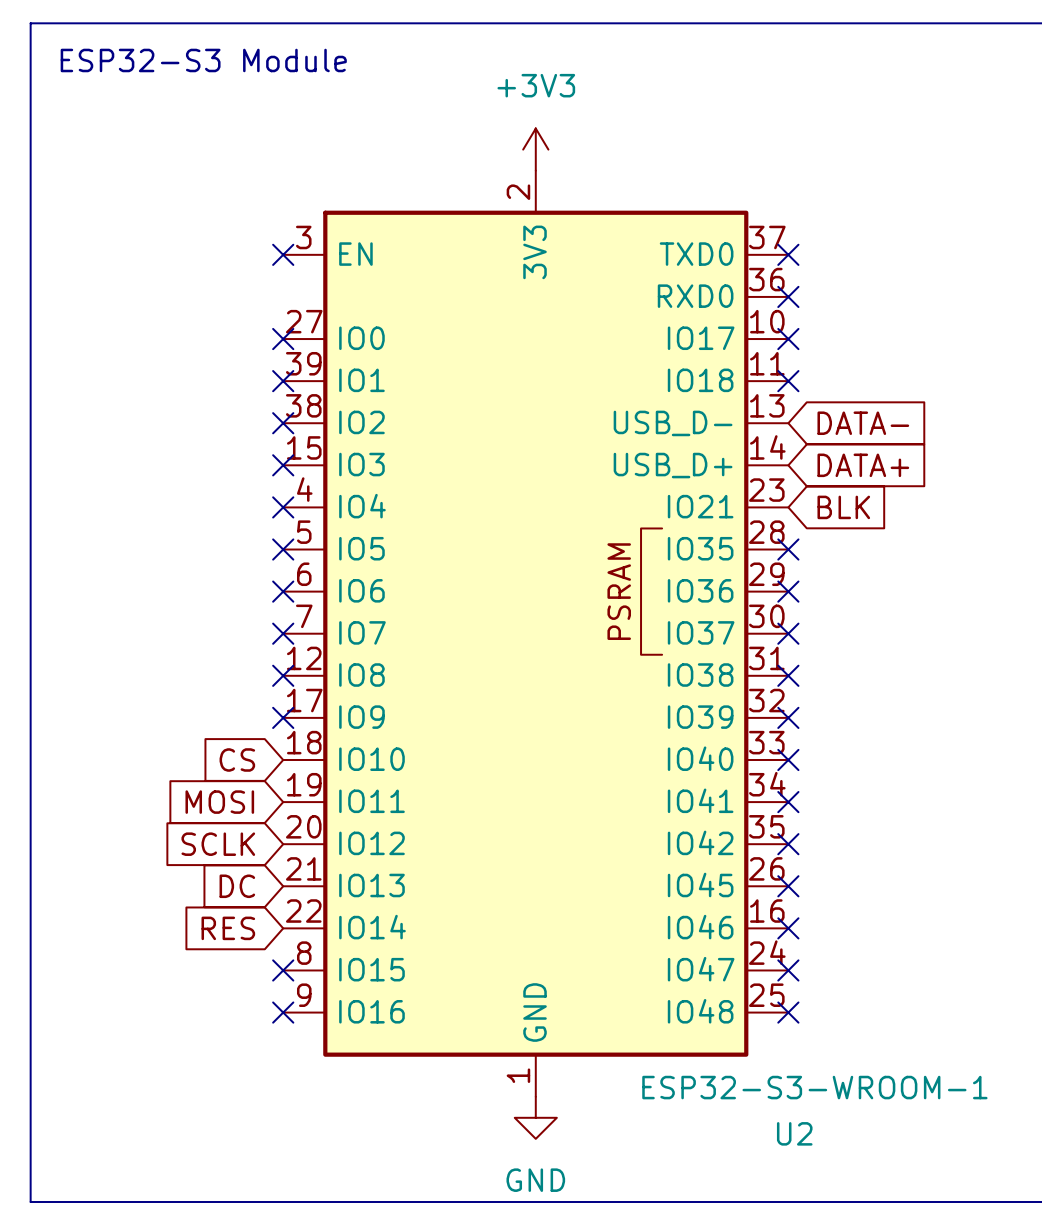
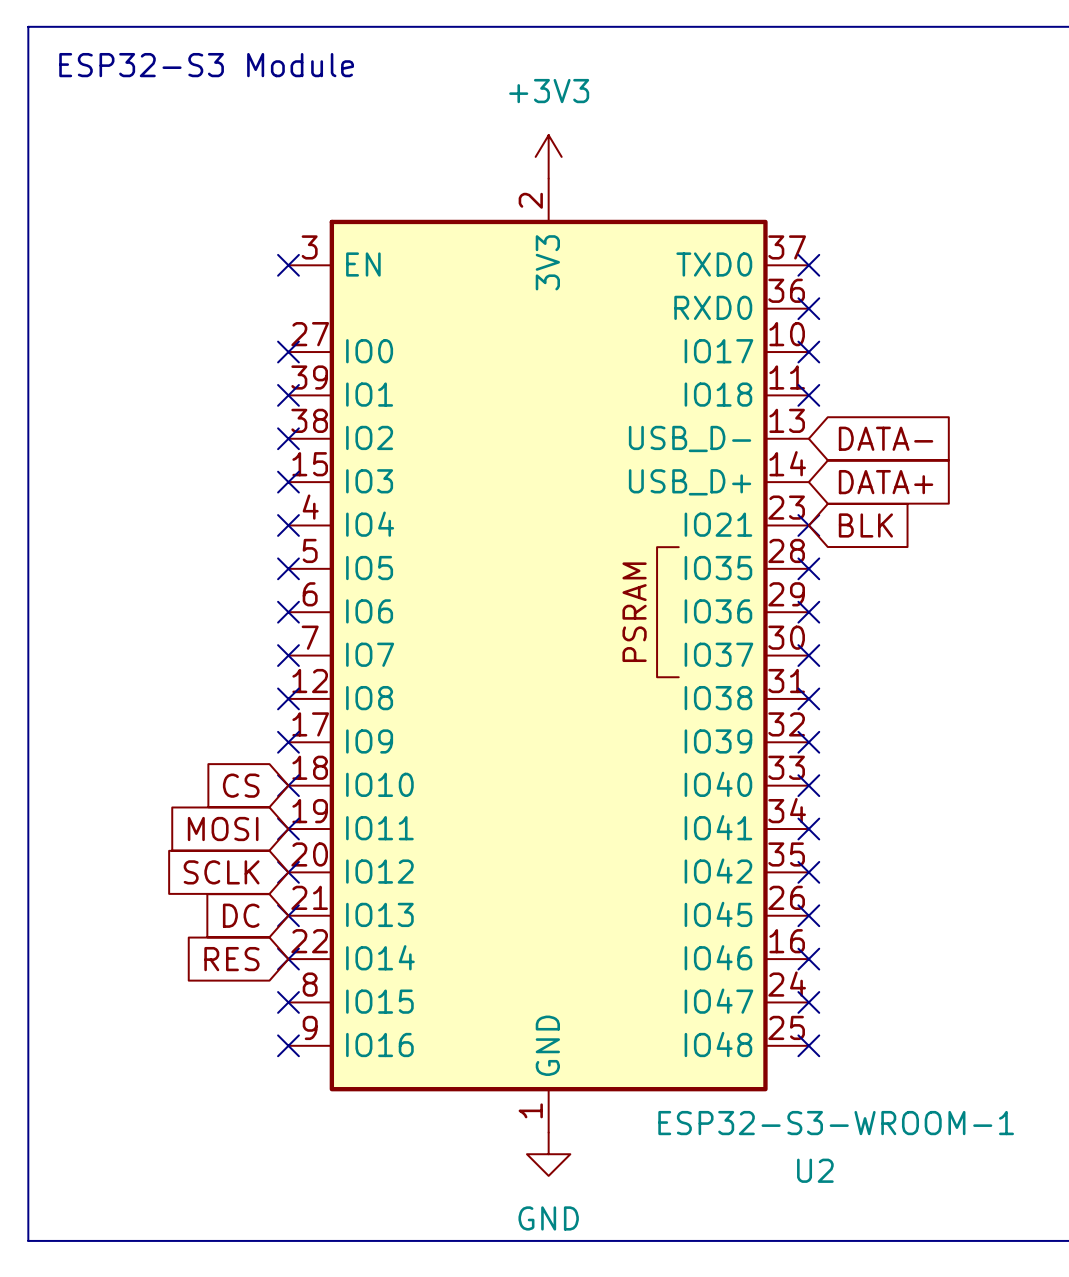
no-connect mark: none -> (808, 525)
no-connect mark: none -> (288, 785)
no-connect mark: none -> (288, 829)
no-connect mark: none -> (288, 872)
no-connect mark: none -> (288, 915)
no-connect mark: none -> (288, 959)

